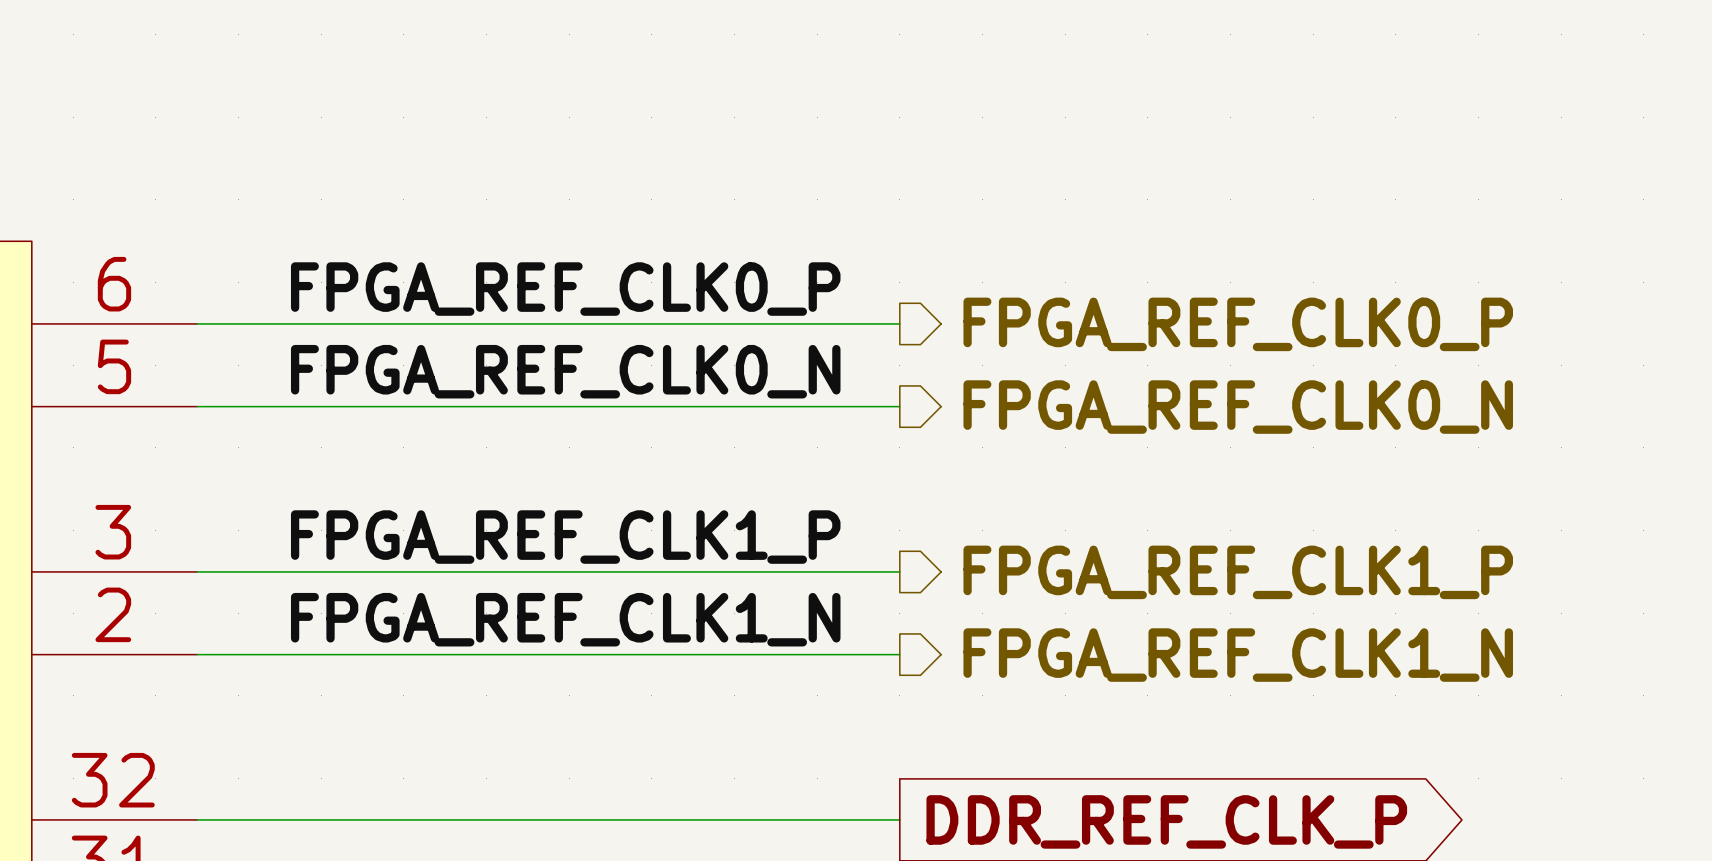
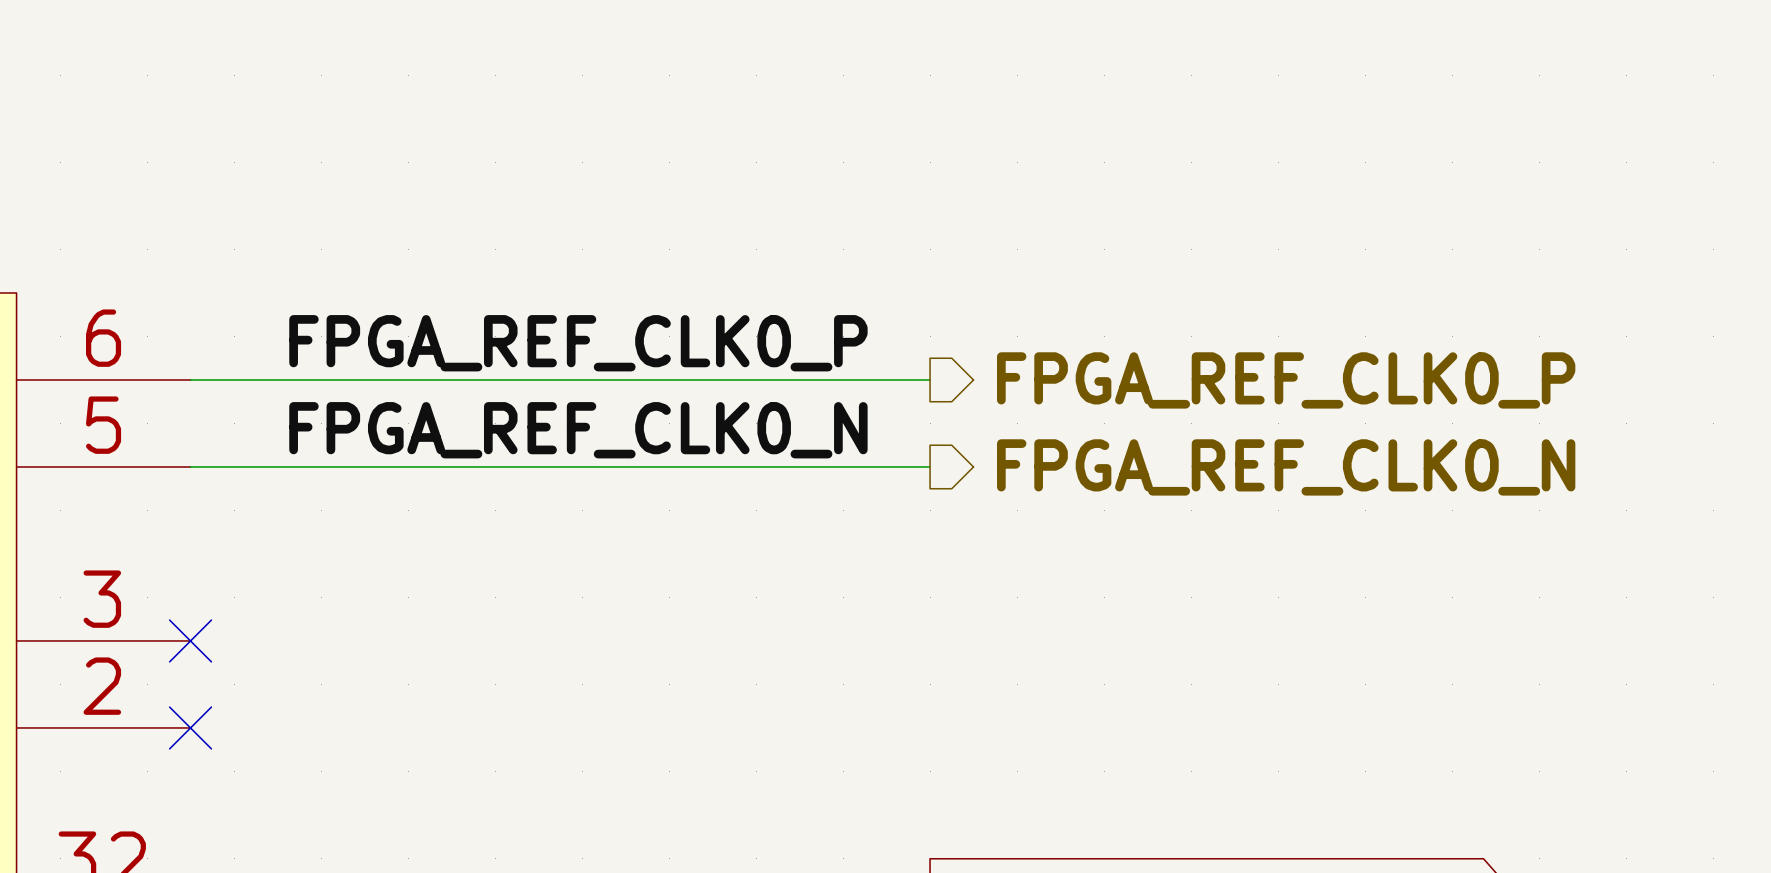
label: FPGA_REF_CLK1_P (565, 537) -> none
wire: (197, 571) (899, 571) -> none
no-connect mark: none -> (190, 640)
hierarchical label: FPGA_REF_CLK1_P (1238, 572) -> none
label: FPGA_REF_CLK1_N (565, 619) -> none
wire: (197, 654) (899, 654) -> none
no-connect mark: none -> (190, 727)
hierarchical label: FPGA_REF_CLK1_N (1238, 655) -> none

